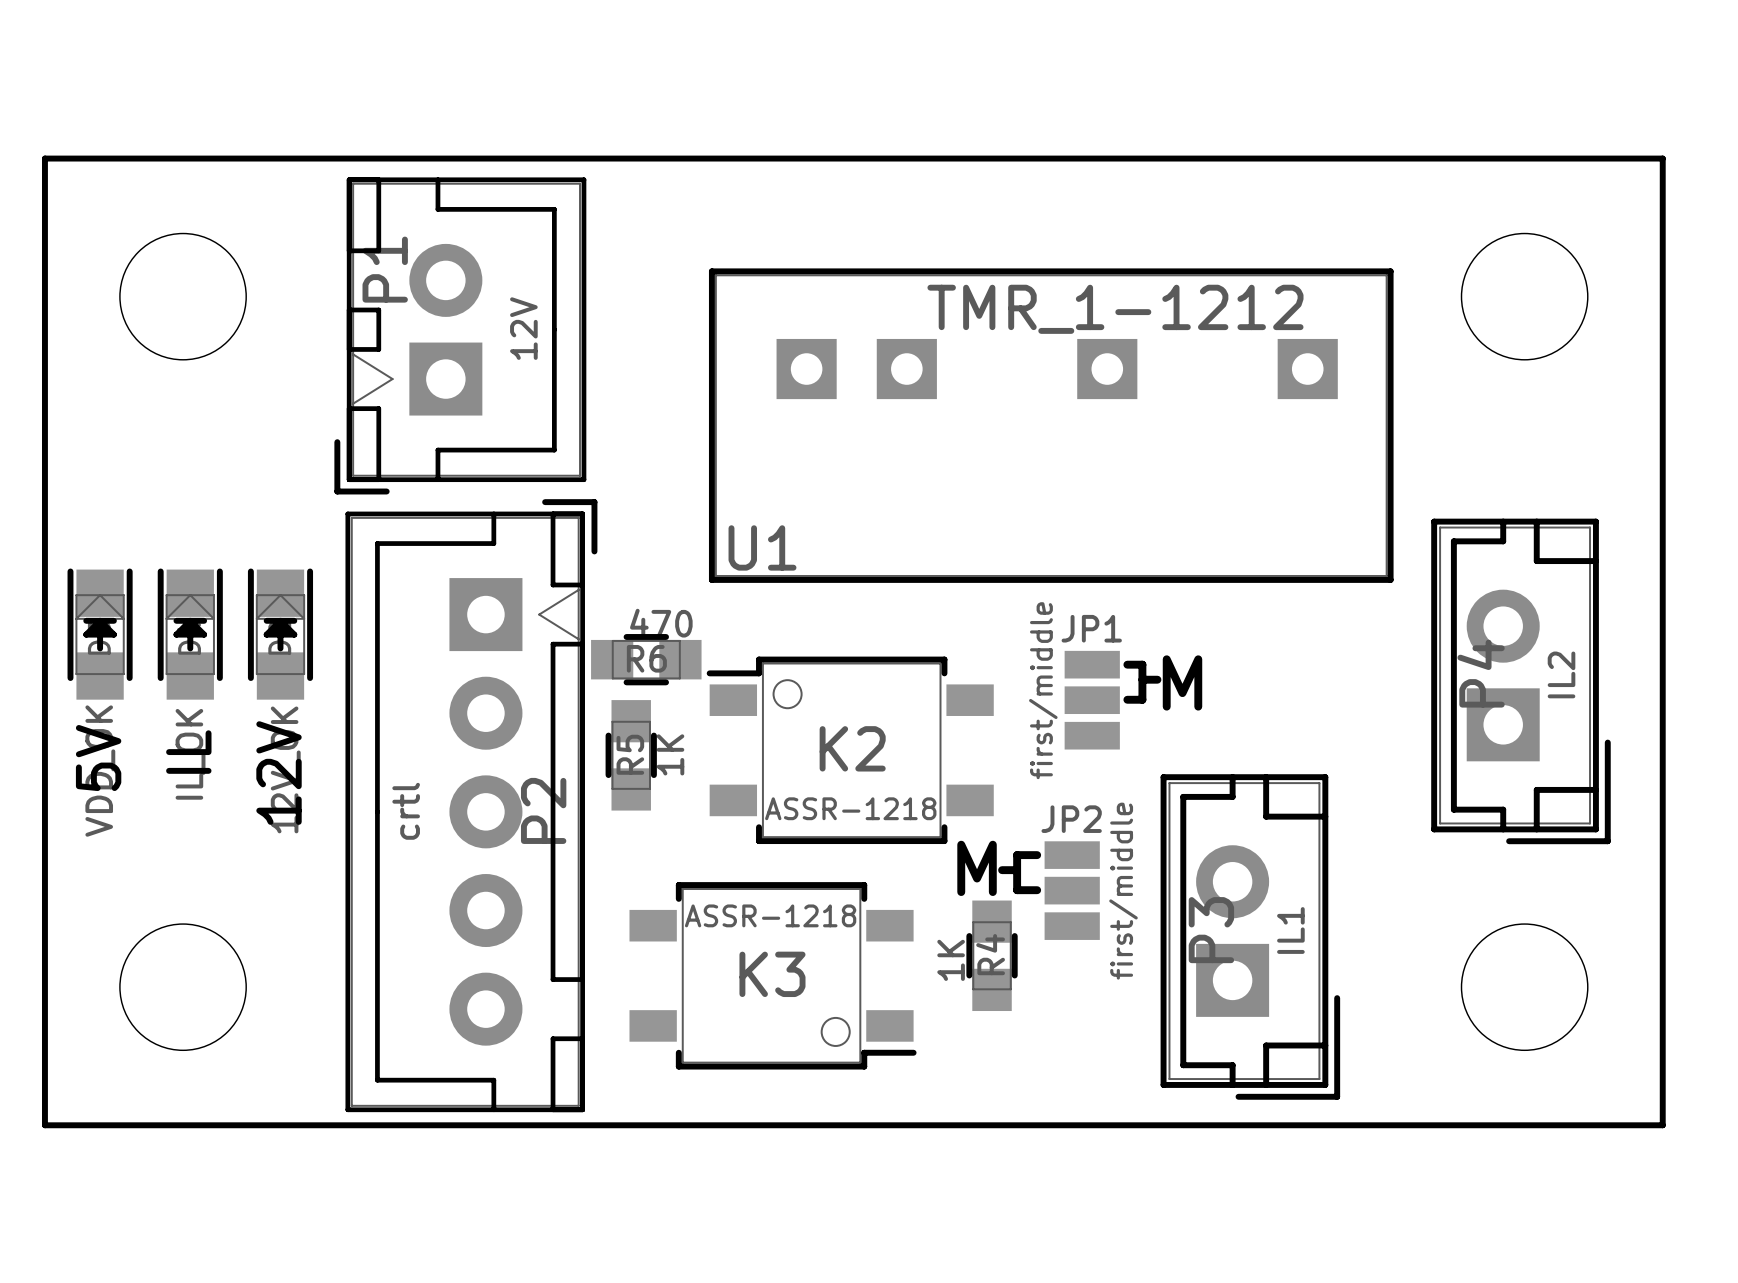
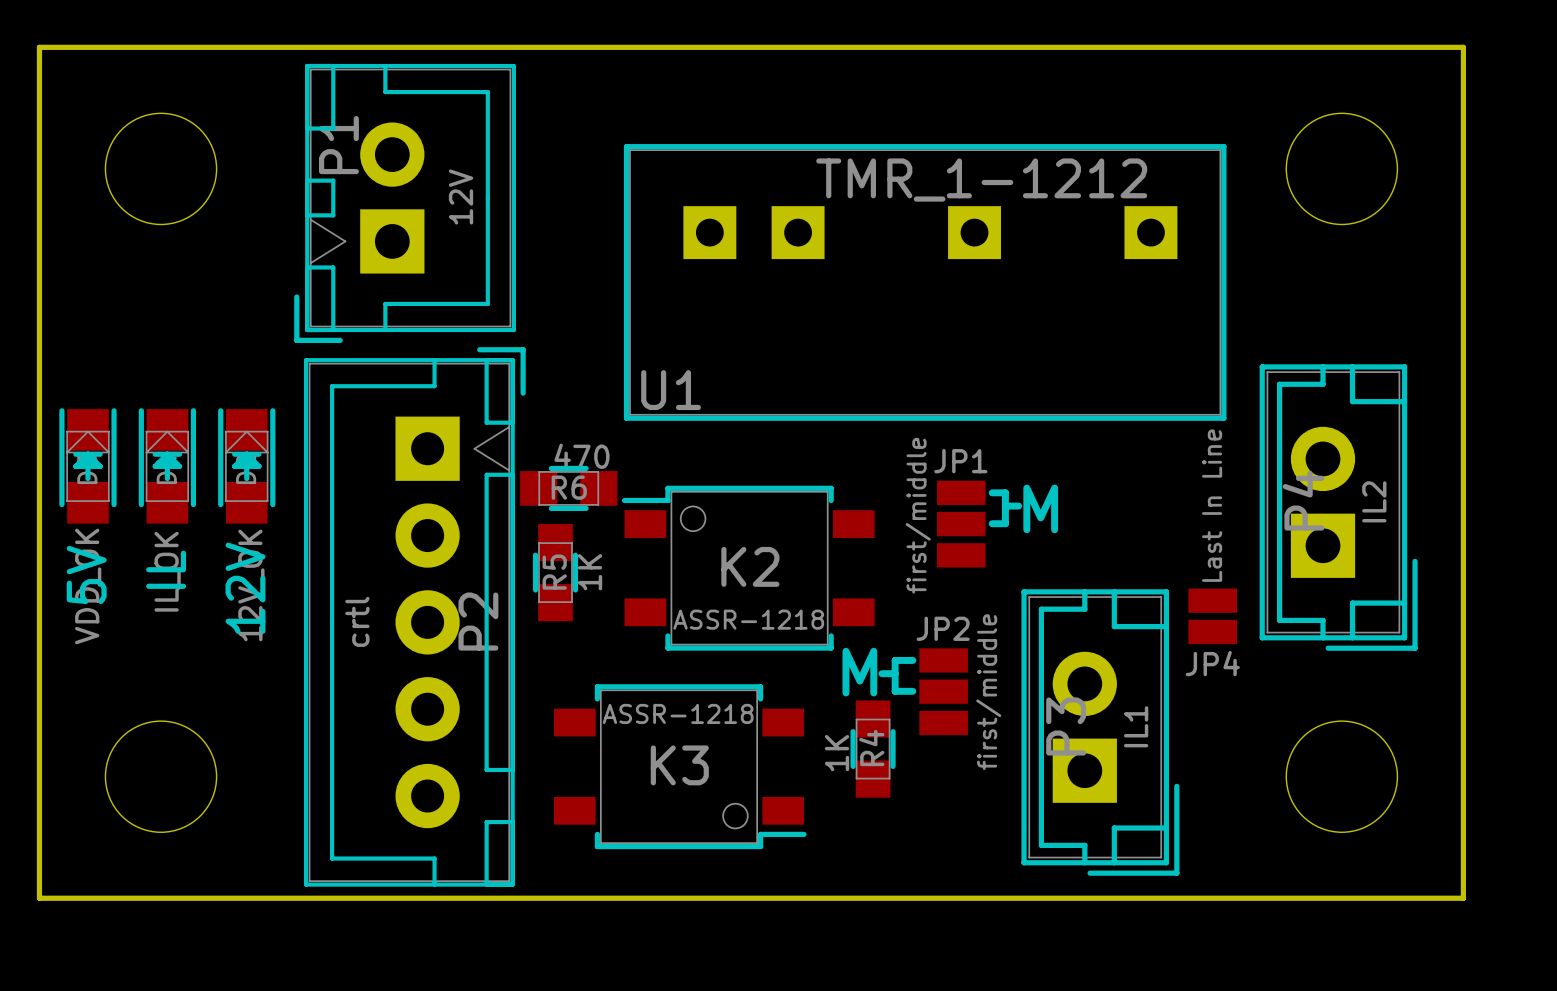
JP4: none -> Last In Line (1212, 616)

